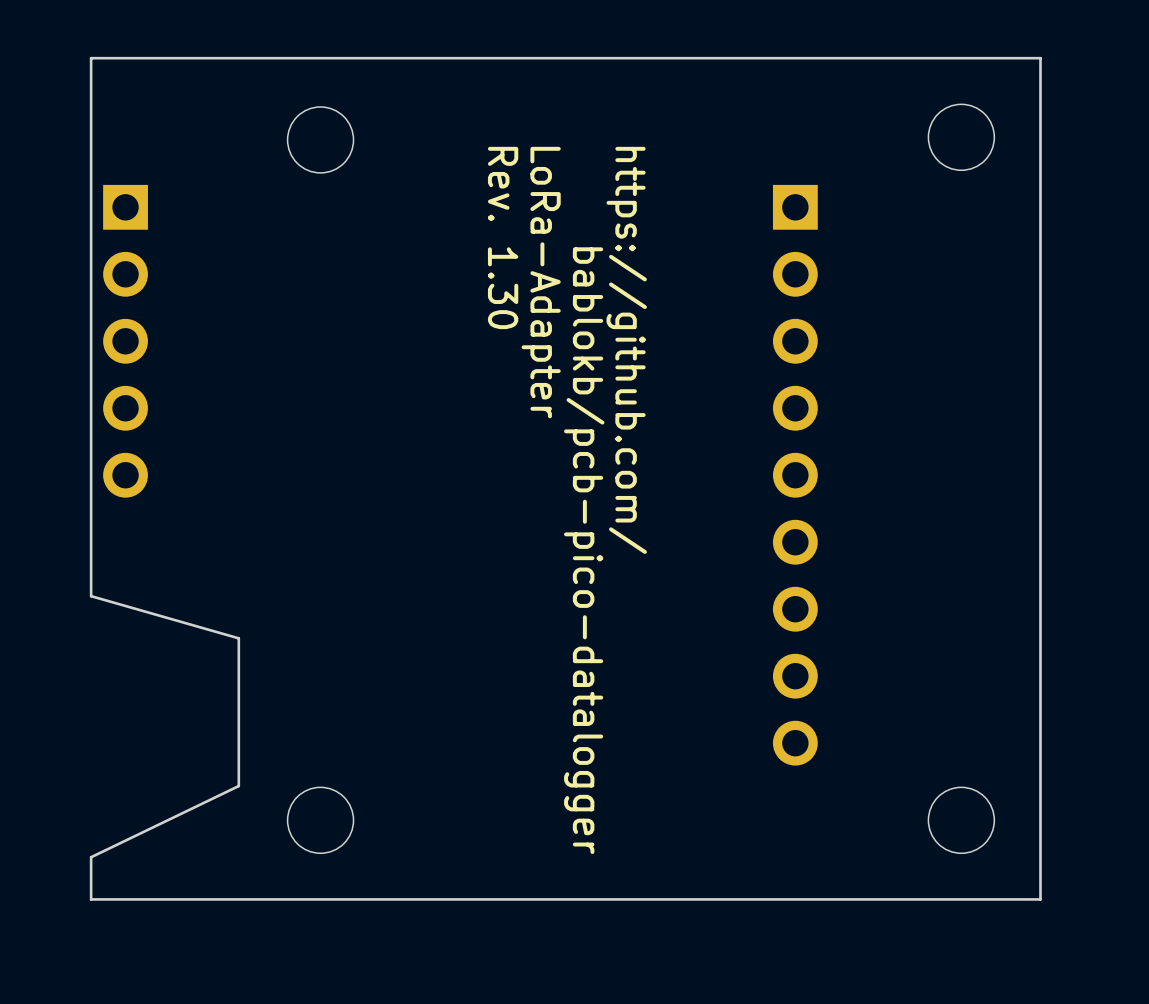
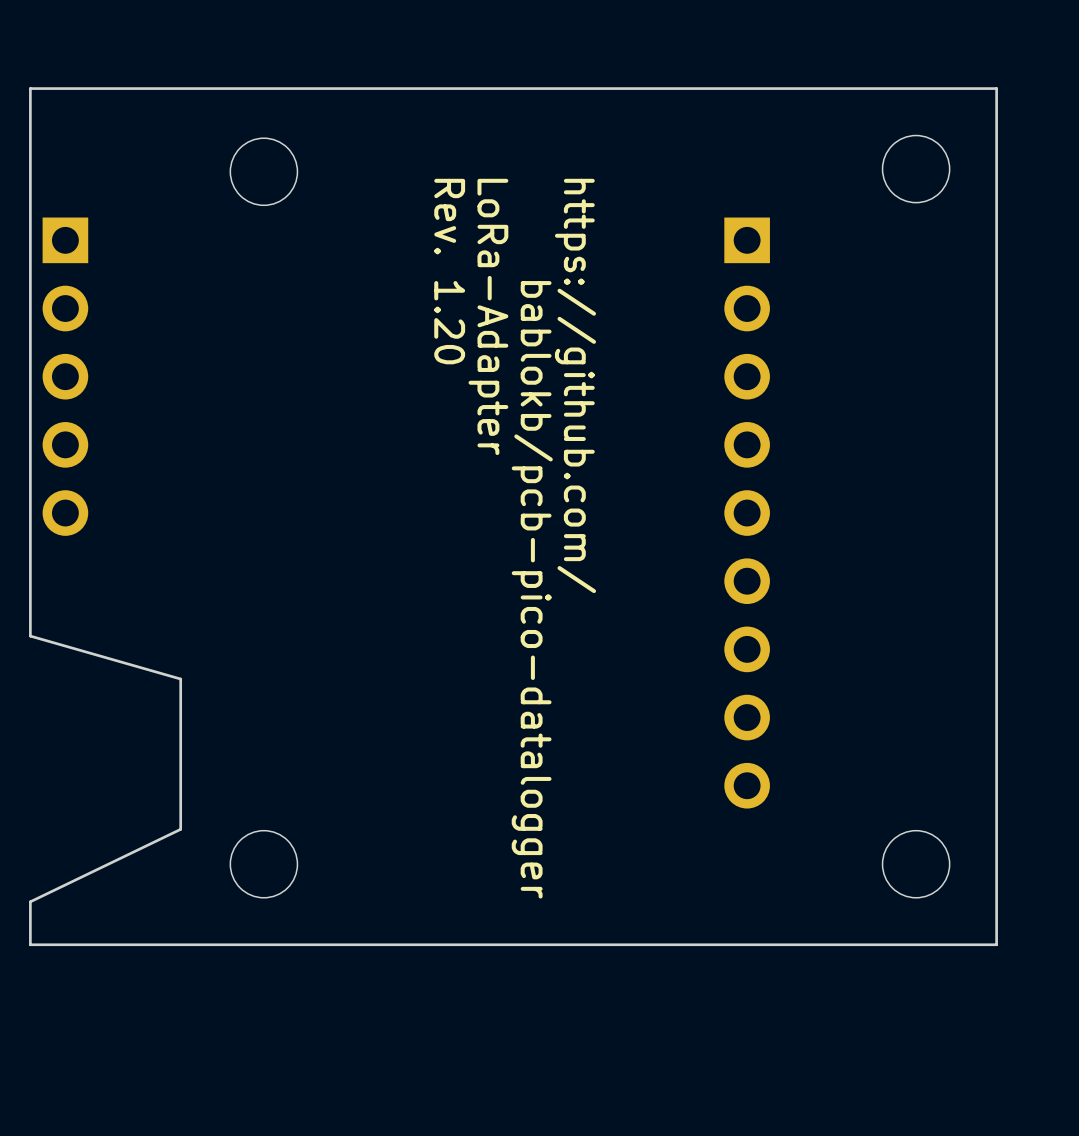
text: Rev. 1.30 (503, 237) -> Rev. 1.20 (449, 271)

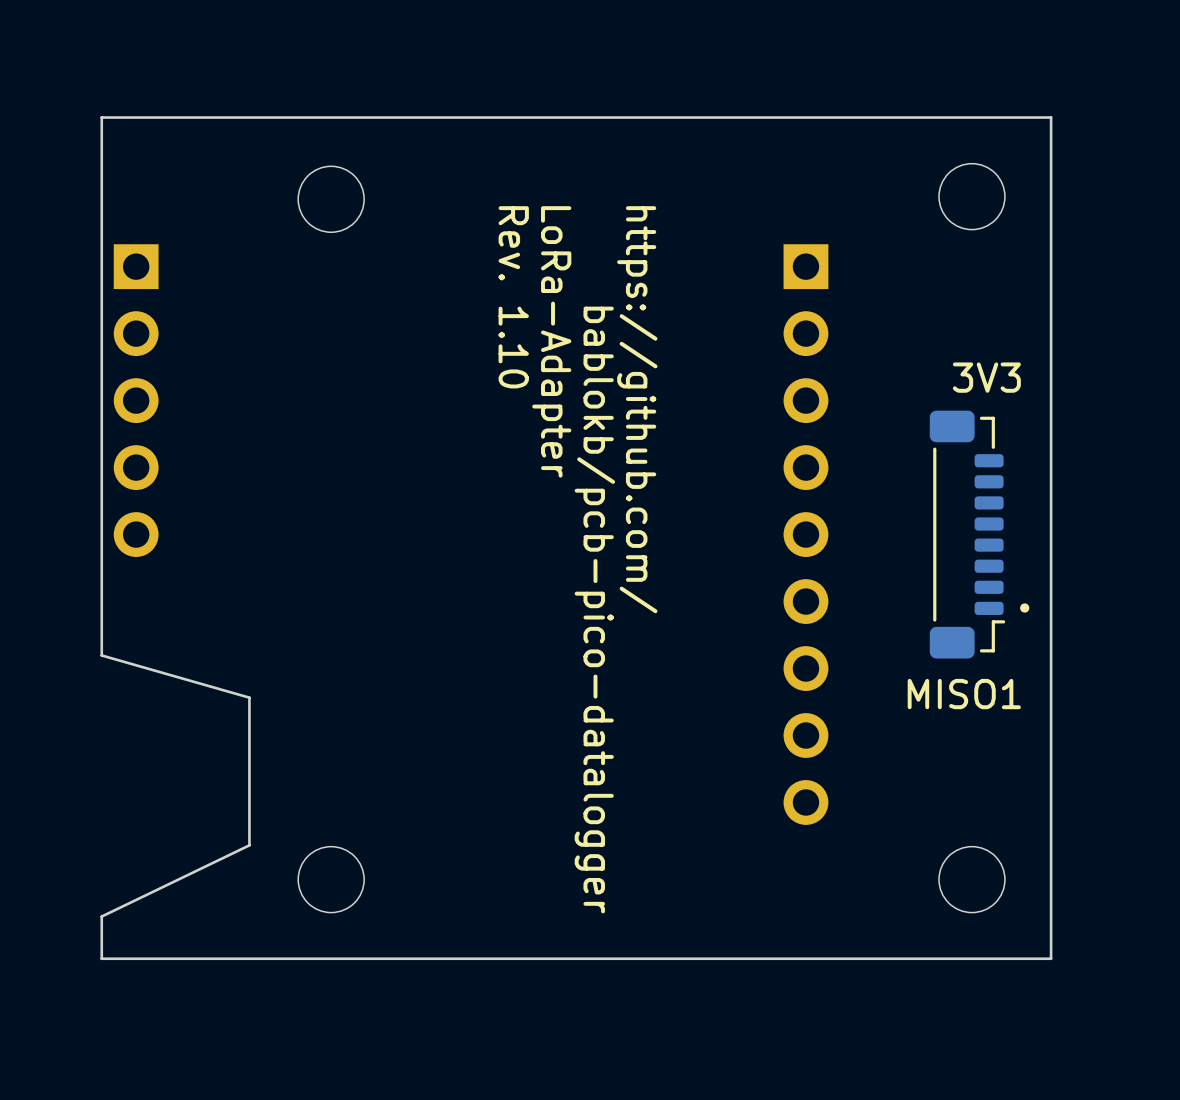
text: Rev. 1.20 (449, 271) -> Rev. 1.10 (513, 297)
text: none -> 3V3 (986, 377)
part: none -> (967, 534)
drawing: none -> [1020, 603, 1030, 613]
text: none -> MISO1 (964, 694)

